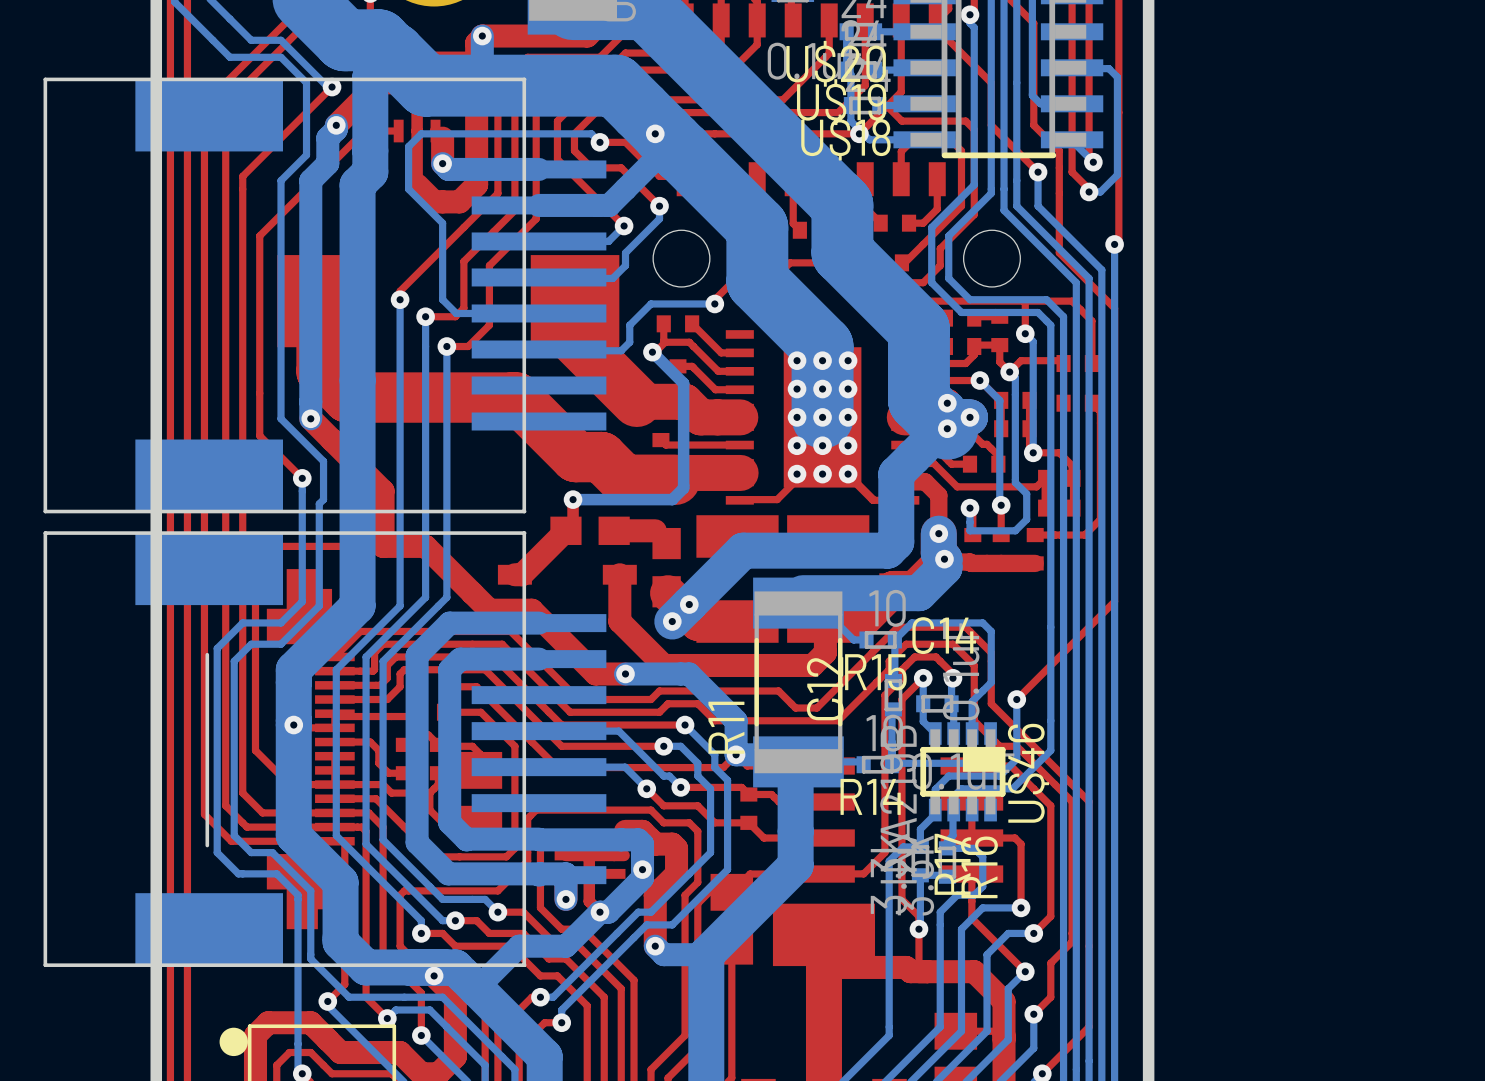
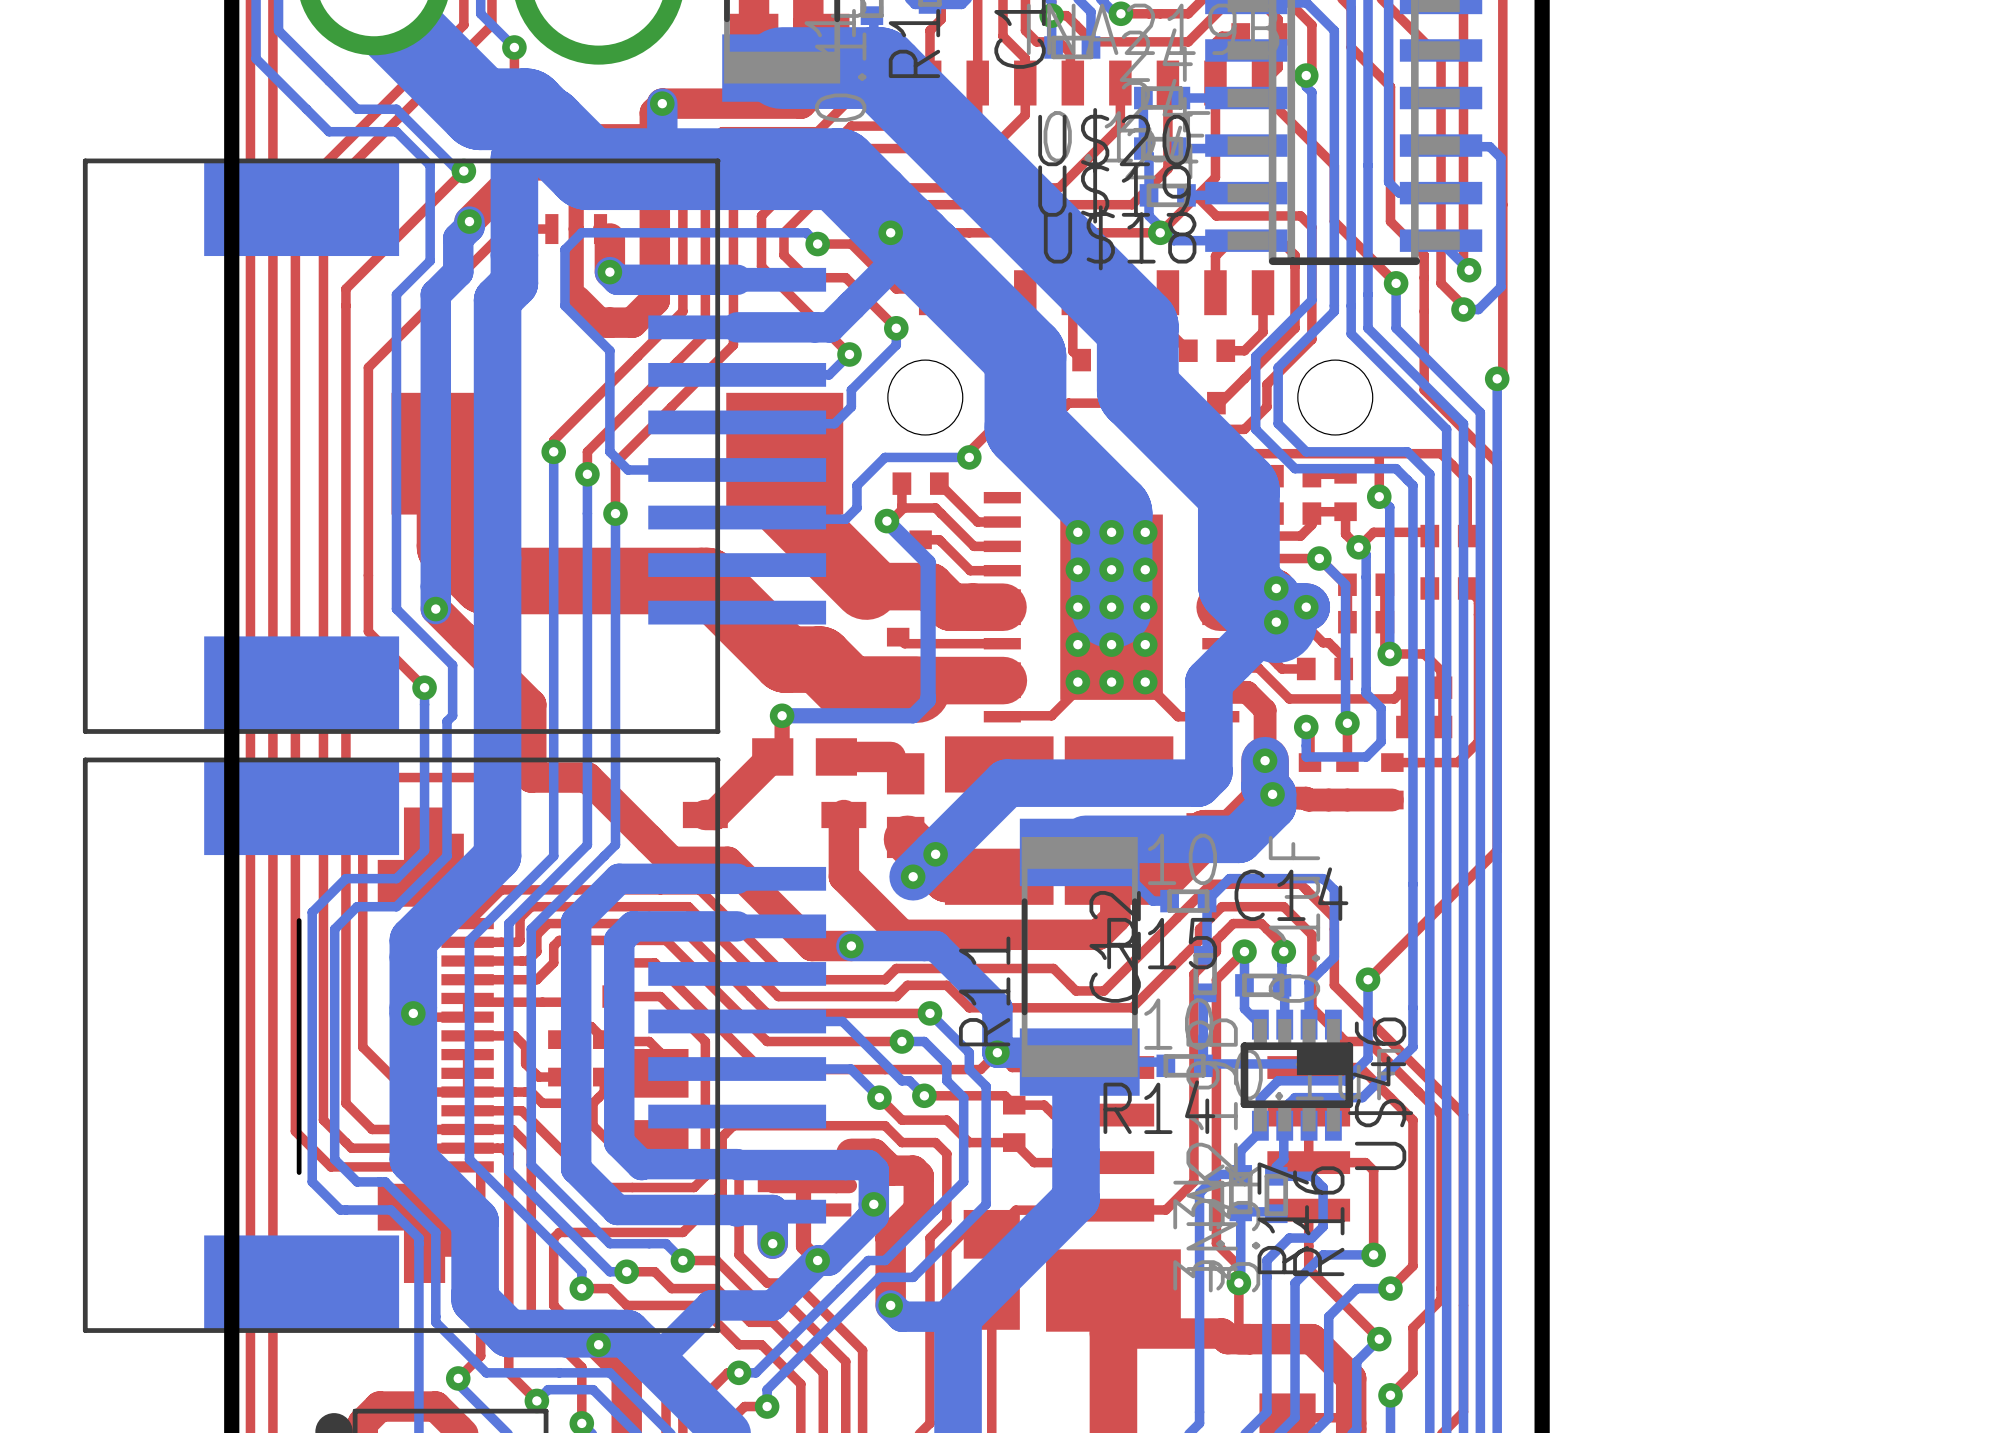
part footprint: [43, 77, 607, 514] -> [82, 158, 827, 734]
top track: (463, 261) (463, 308) (455, 316) (425, 316) -> (637, 401) (587, 451) (587, 474)
top track: (489, 265) (489, 325) (468, 346) (446, 346) -> (671, 406) (615, 463) (615, 513)
part footprint: [43, 531, 607, 967] -> [82, 757, 827, 1333]

